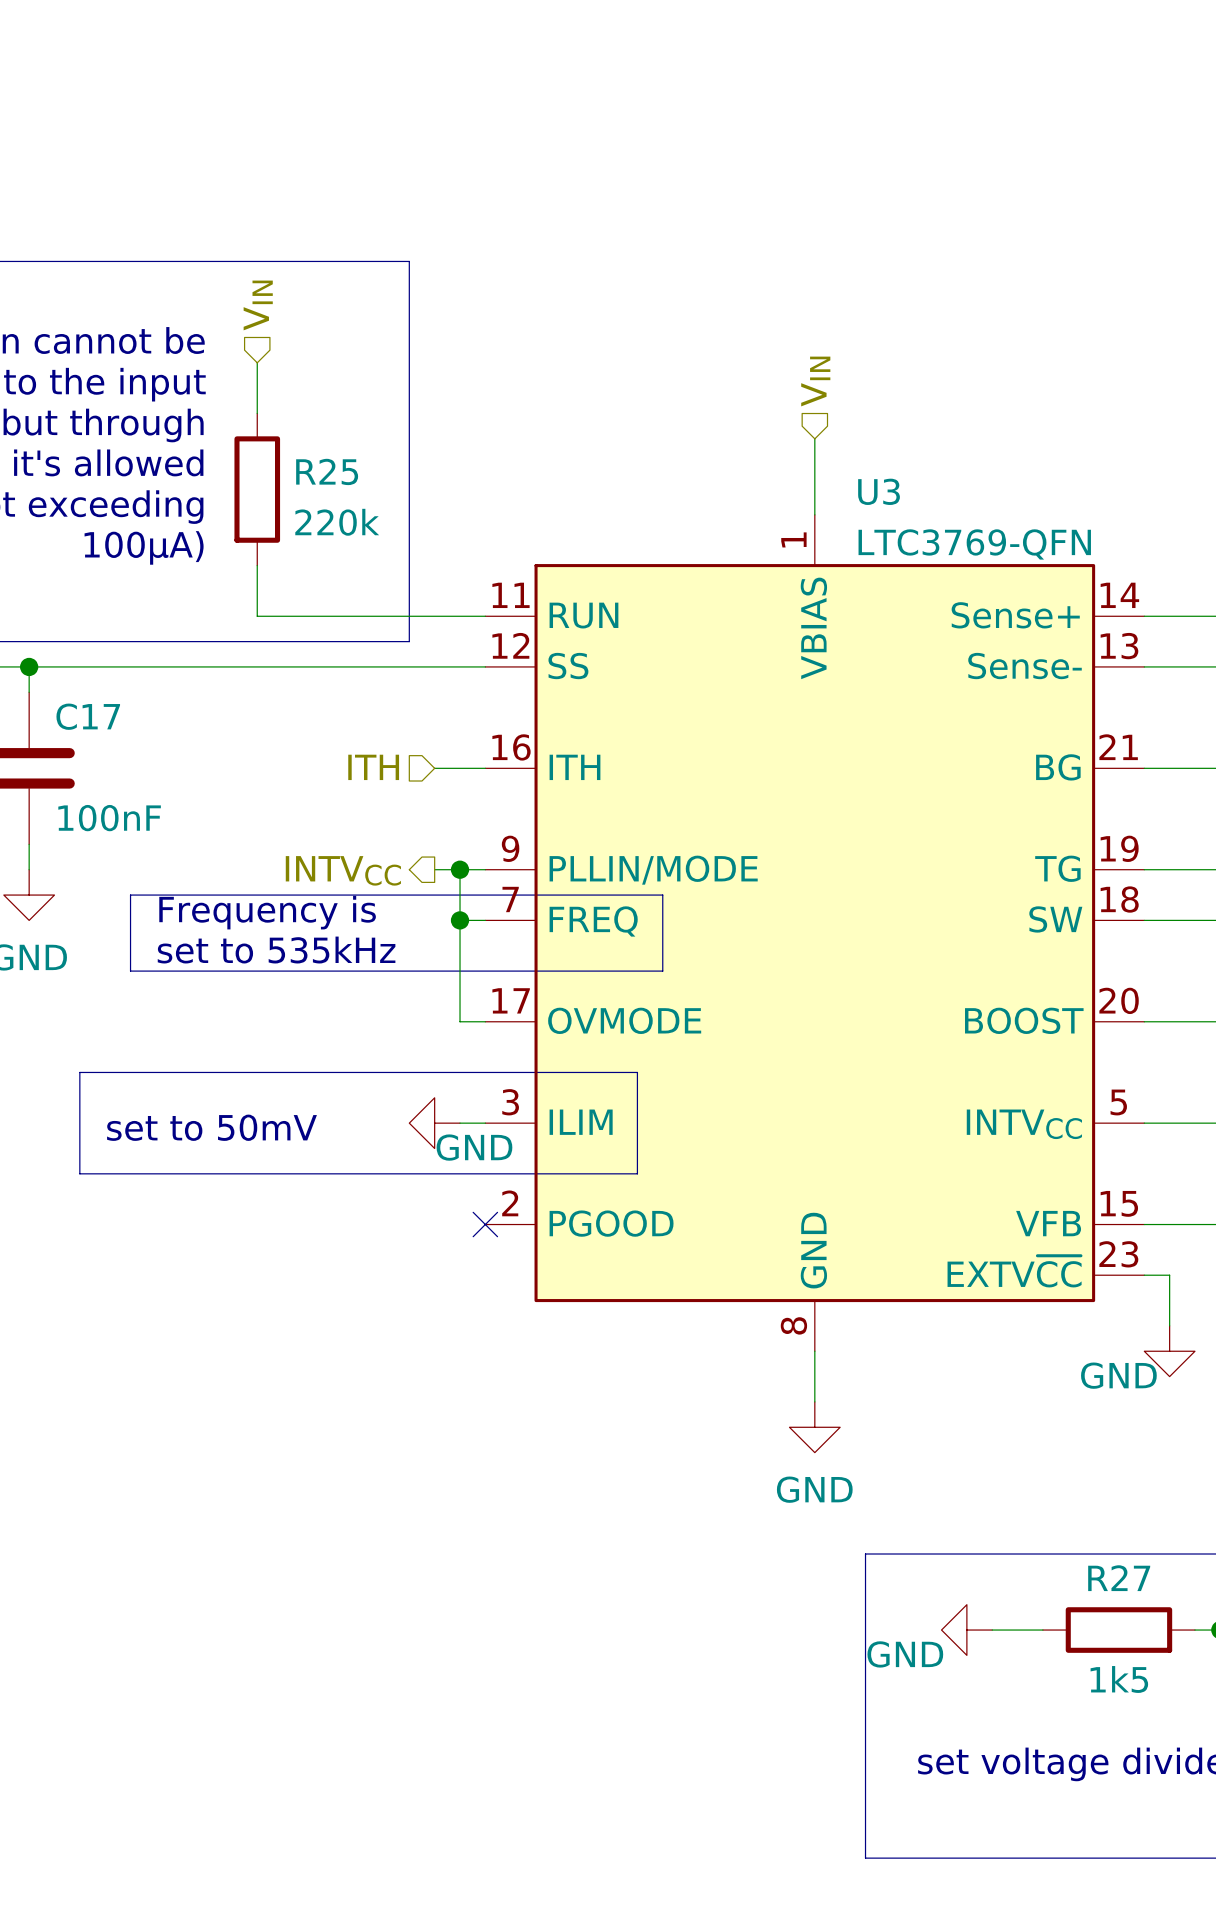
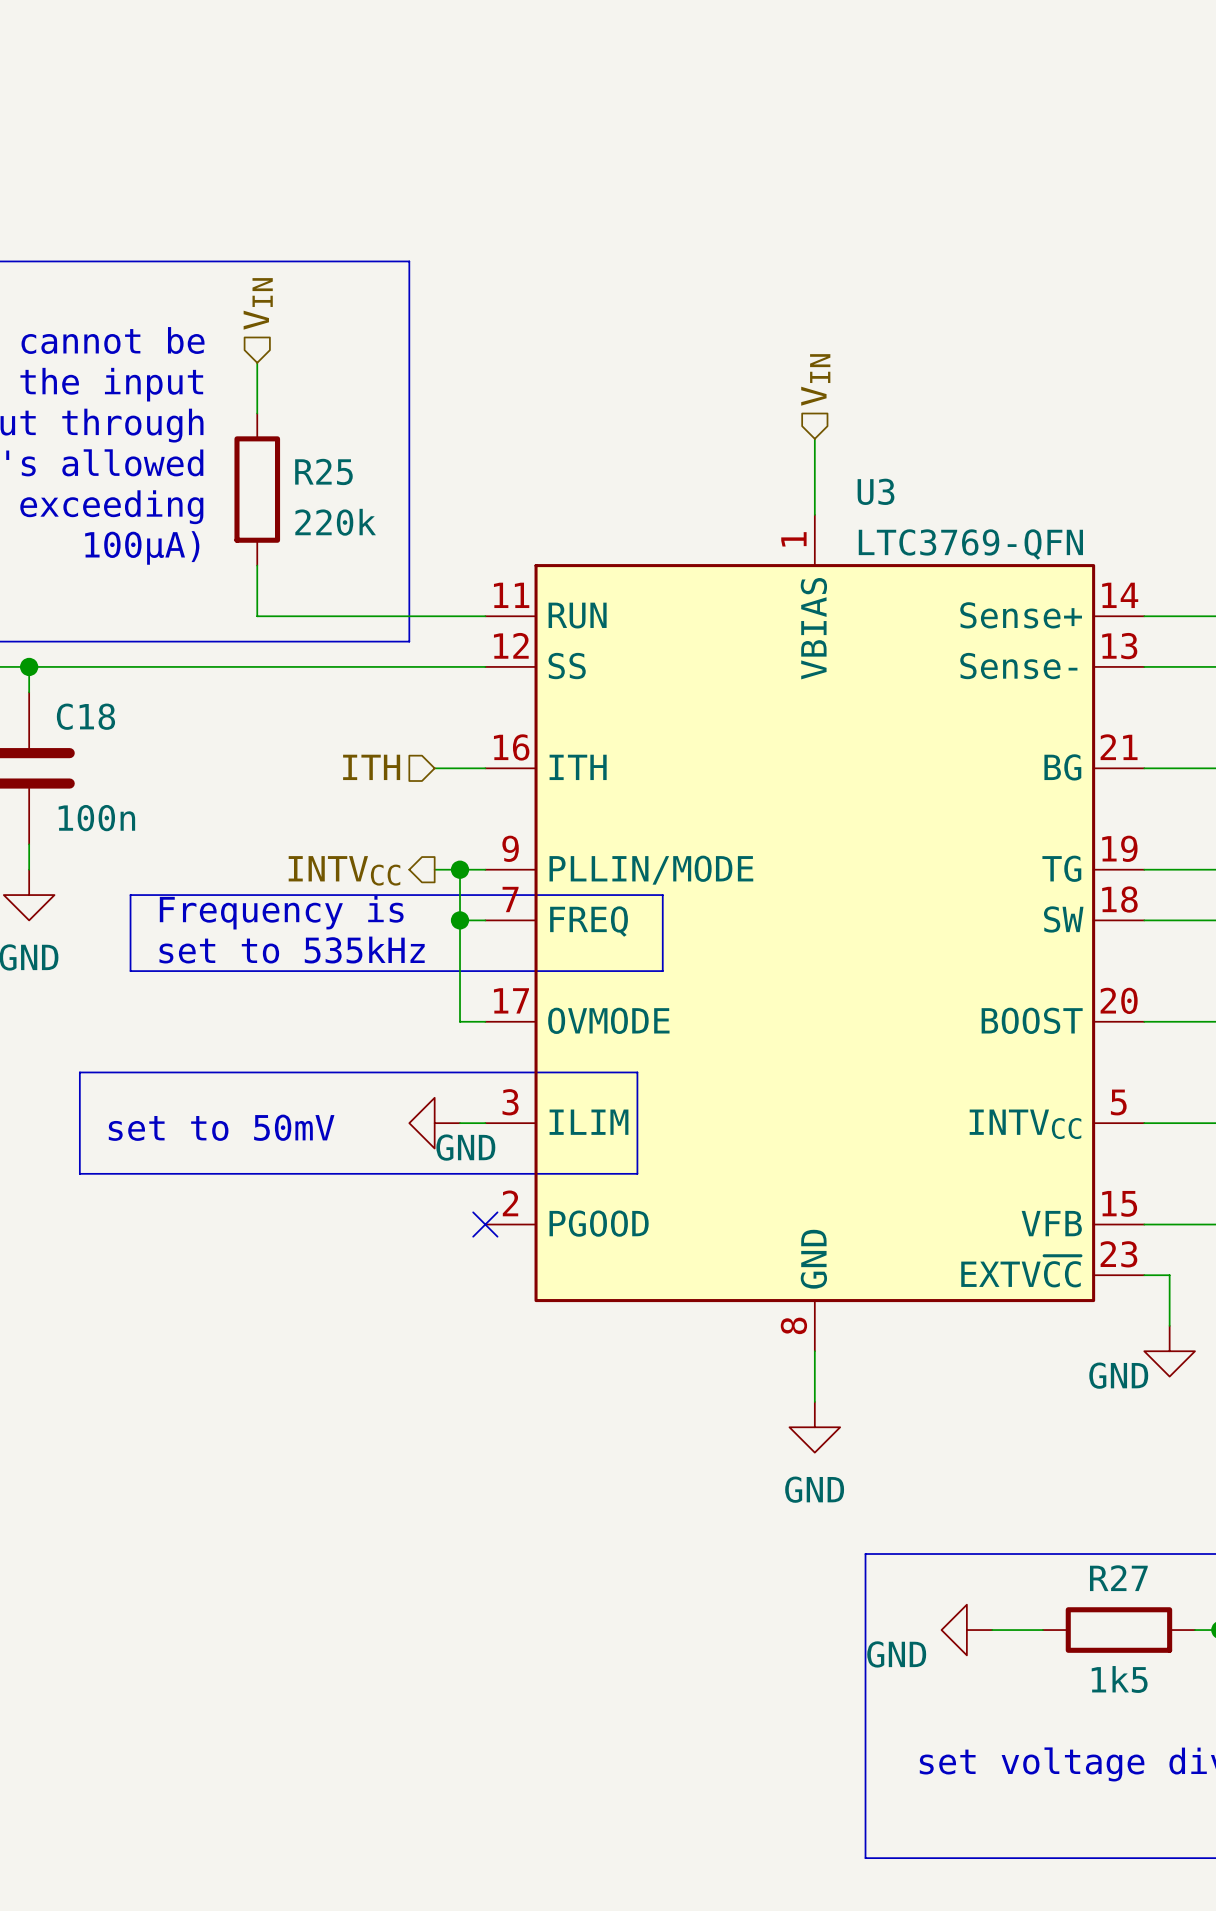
C17 name: C17 (88, 716) -> C18 (85, 716)
C17 value: 100nF (109, 818) -> 100n (96, 818)

